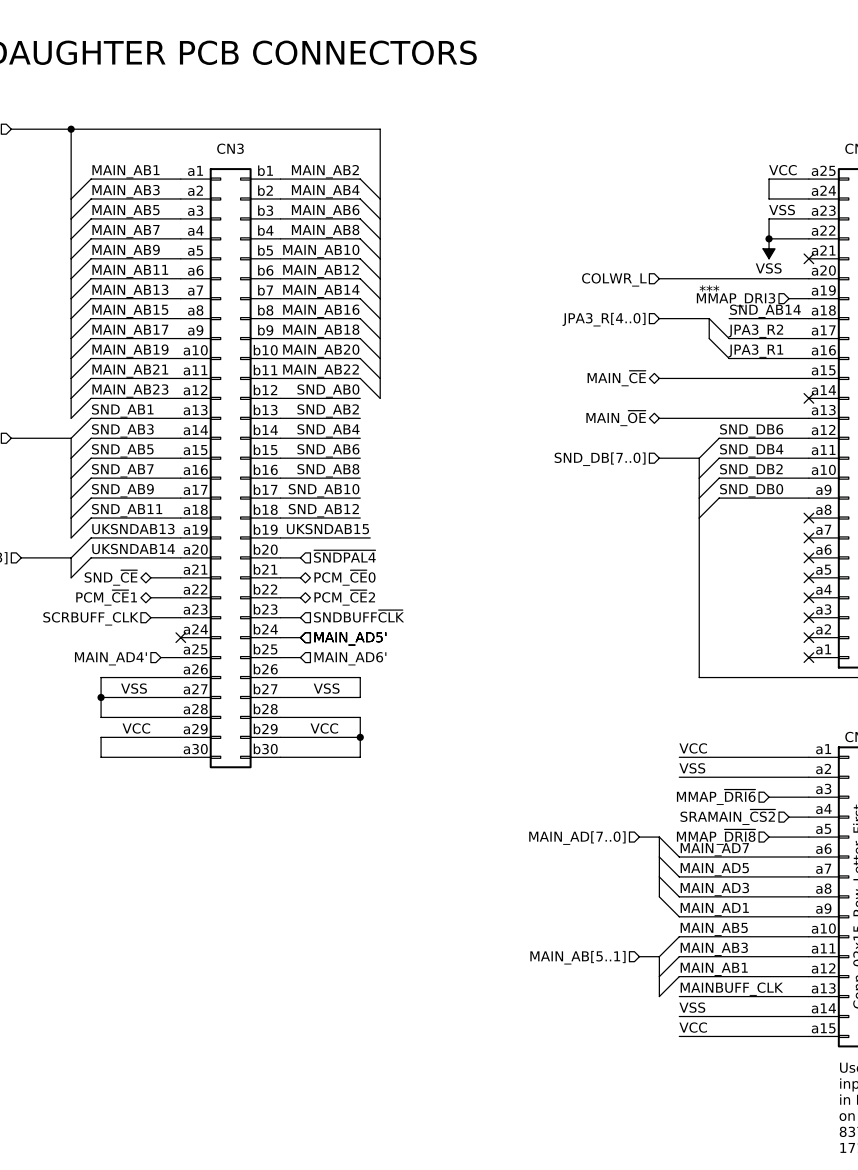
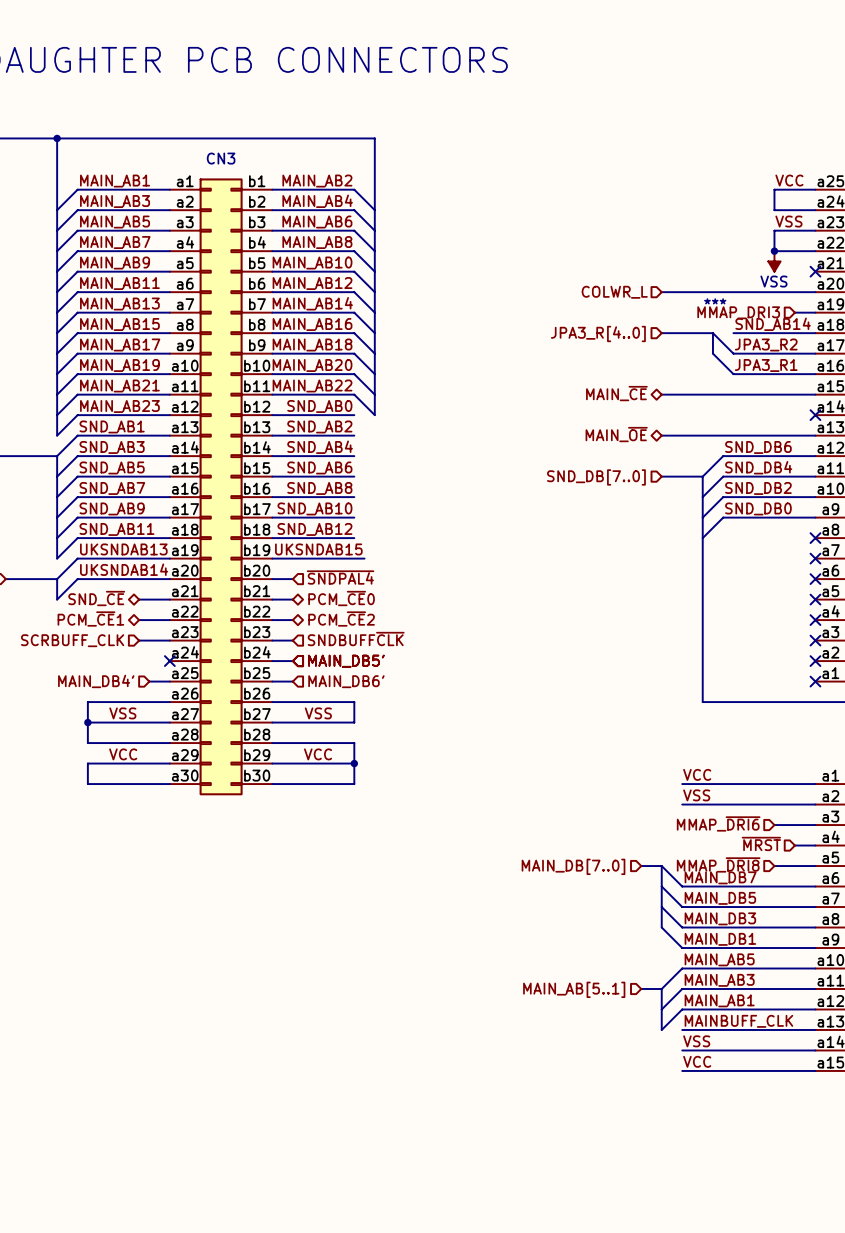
hierarchical label: MAIN_AD5' (350, 638) -> MAIN_DB5' (346, 661)
hierarchical label: MAIN_AD4' (110, 658) -> MAIN_DB4' (96, 681)
hierarchical label: MAIN_AD6' (350, 658) -> MAIN_DB6' (346, 681)
hierarchical label: SRAMAIN_~{CS2} (727, 817) -> ~{MRST} (761, 843)
hierarchical label: MAIN_AD[7..0] (577, 838) -> MAIN_DB[7..0] (573, 866)
label: MAIN_AD7 (714, 849) -> MAIN_DB7 (720, 877)
label: MAIN_AD5 (714, 869) -> MAIN_DB5 (720, 898)
label: MAIN_AD3 (714, 889) -> MAIN_DB3 (720, 918)
label: MAIN_AD1 (714, 909) -> MAIN_DB1 (720, 939)

